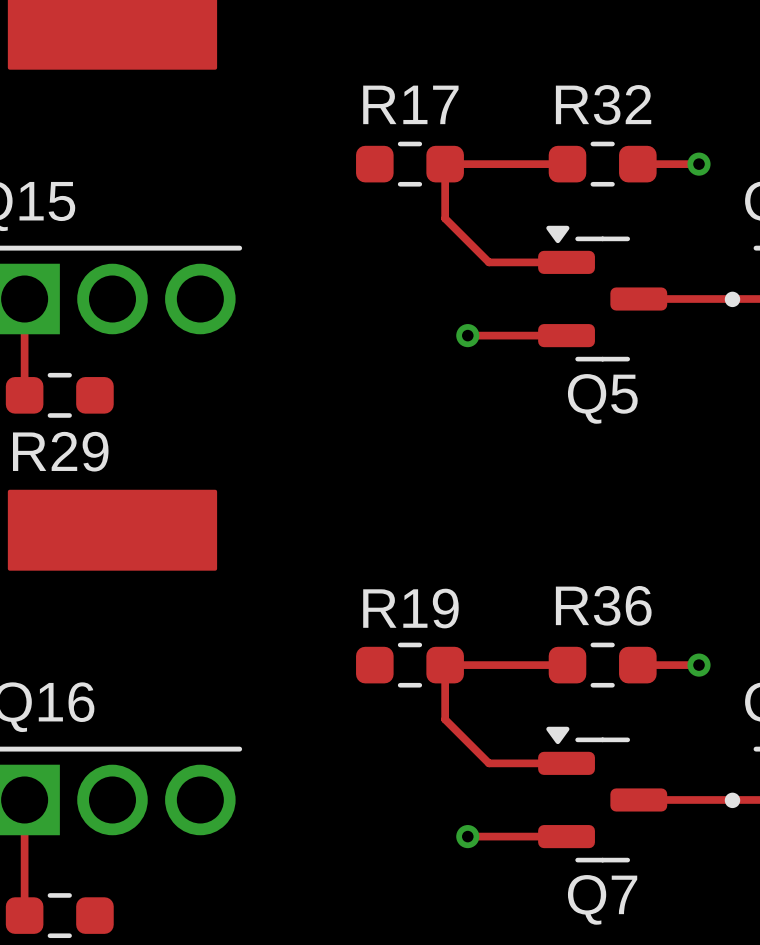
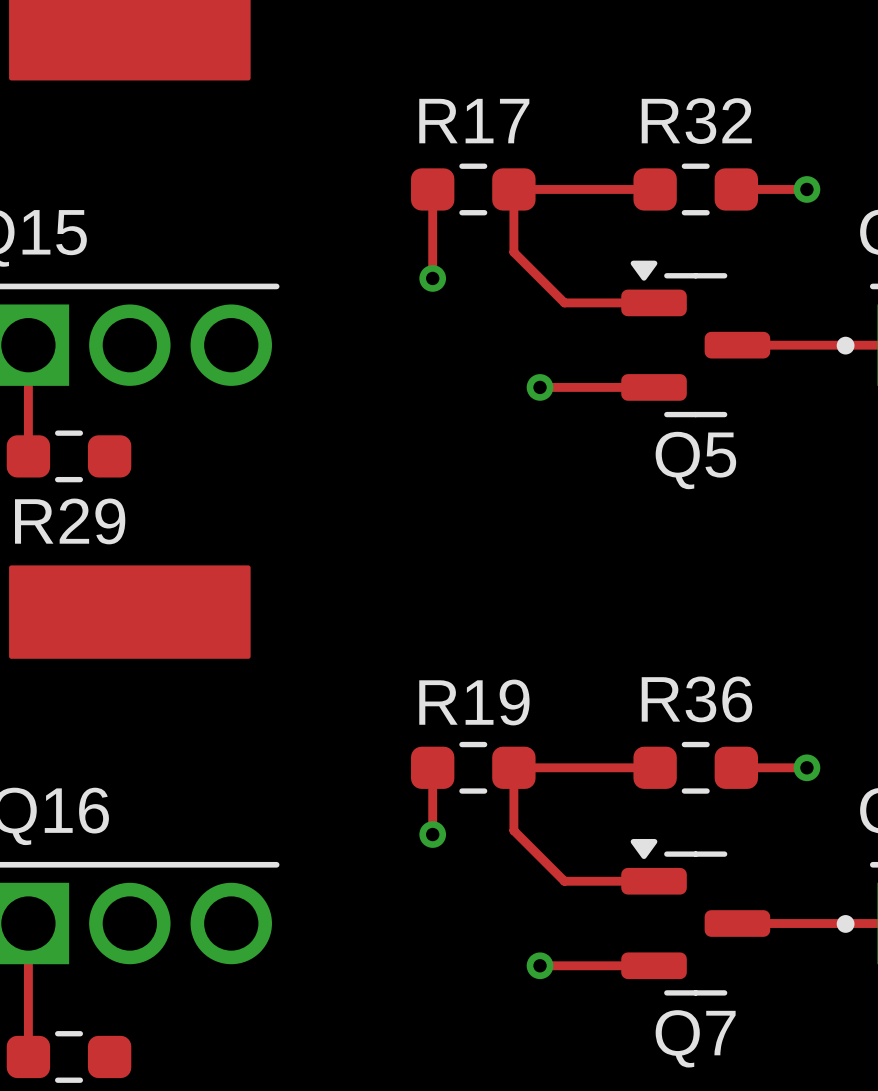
track: none -> (432, 189) (432, 278)
via: none -> (432, 278)
track: none -> (432, 767) (432, 834)
via: none -> (432, 834)

